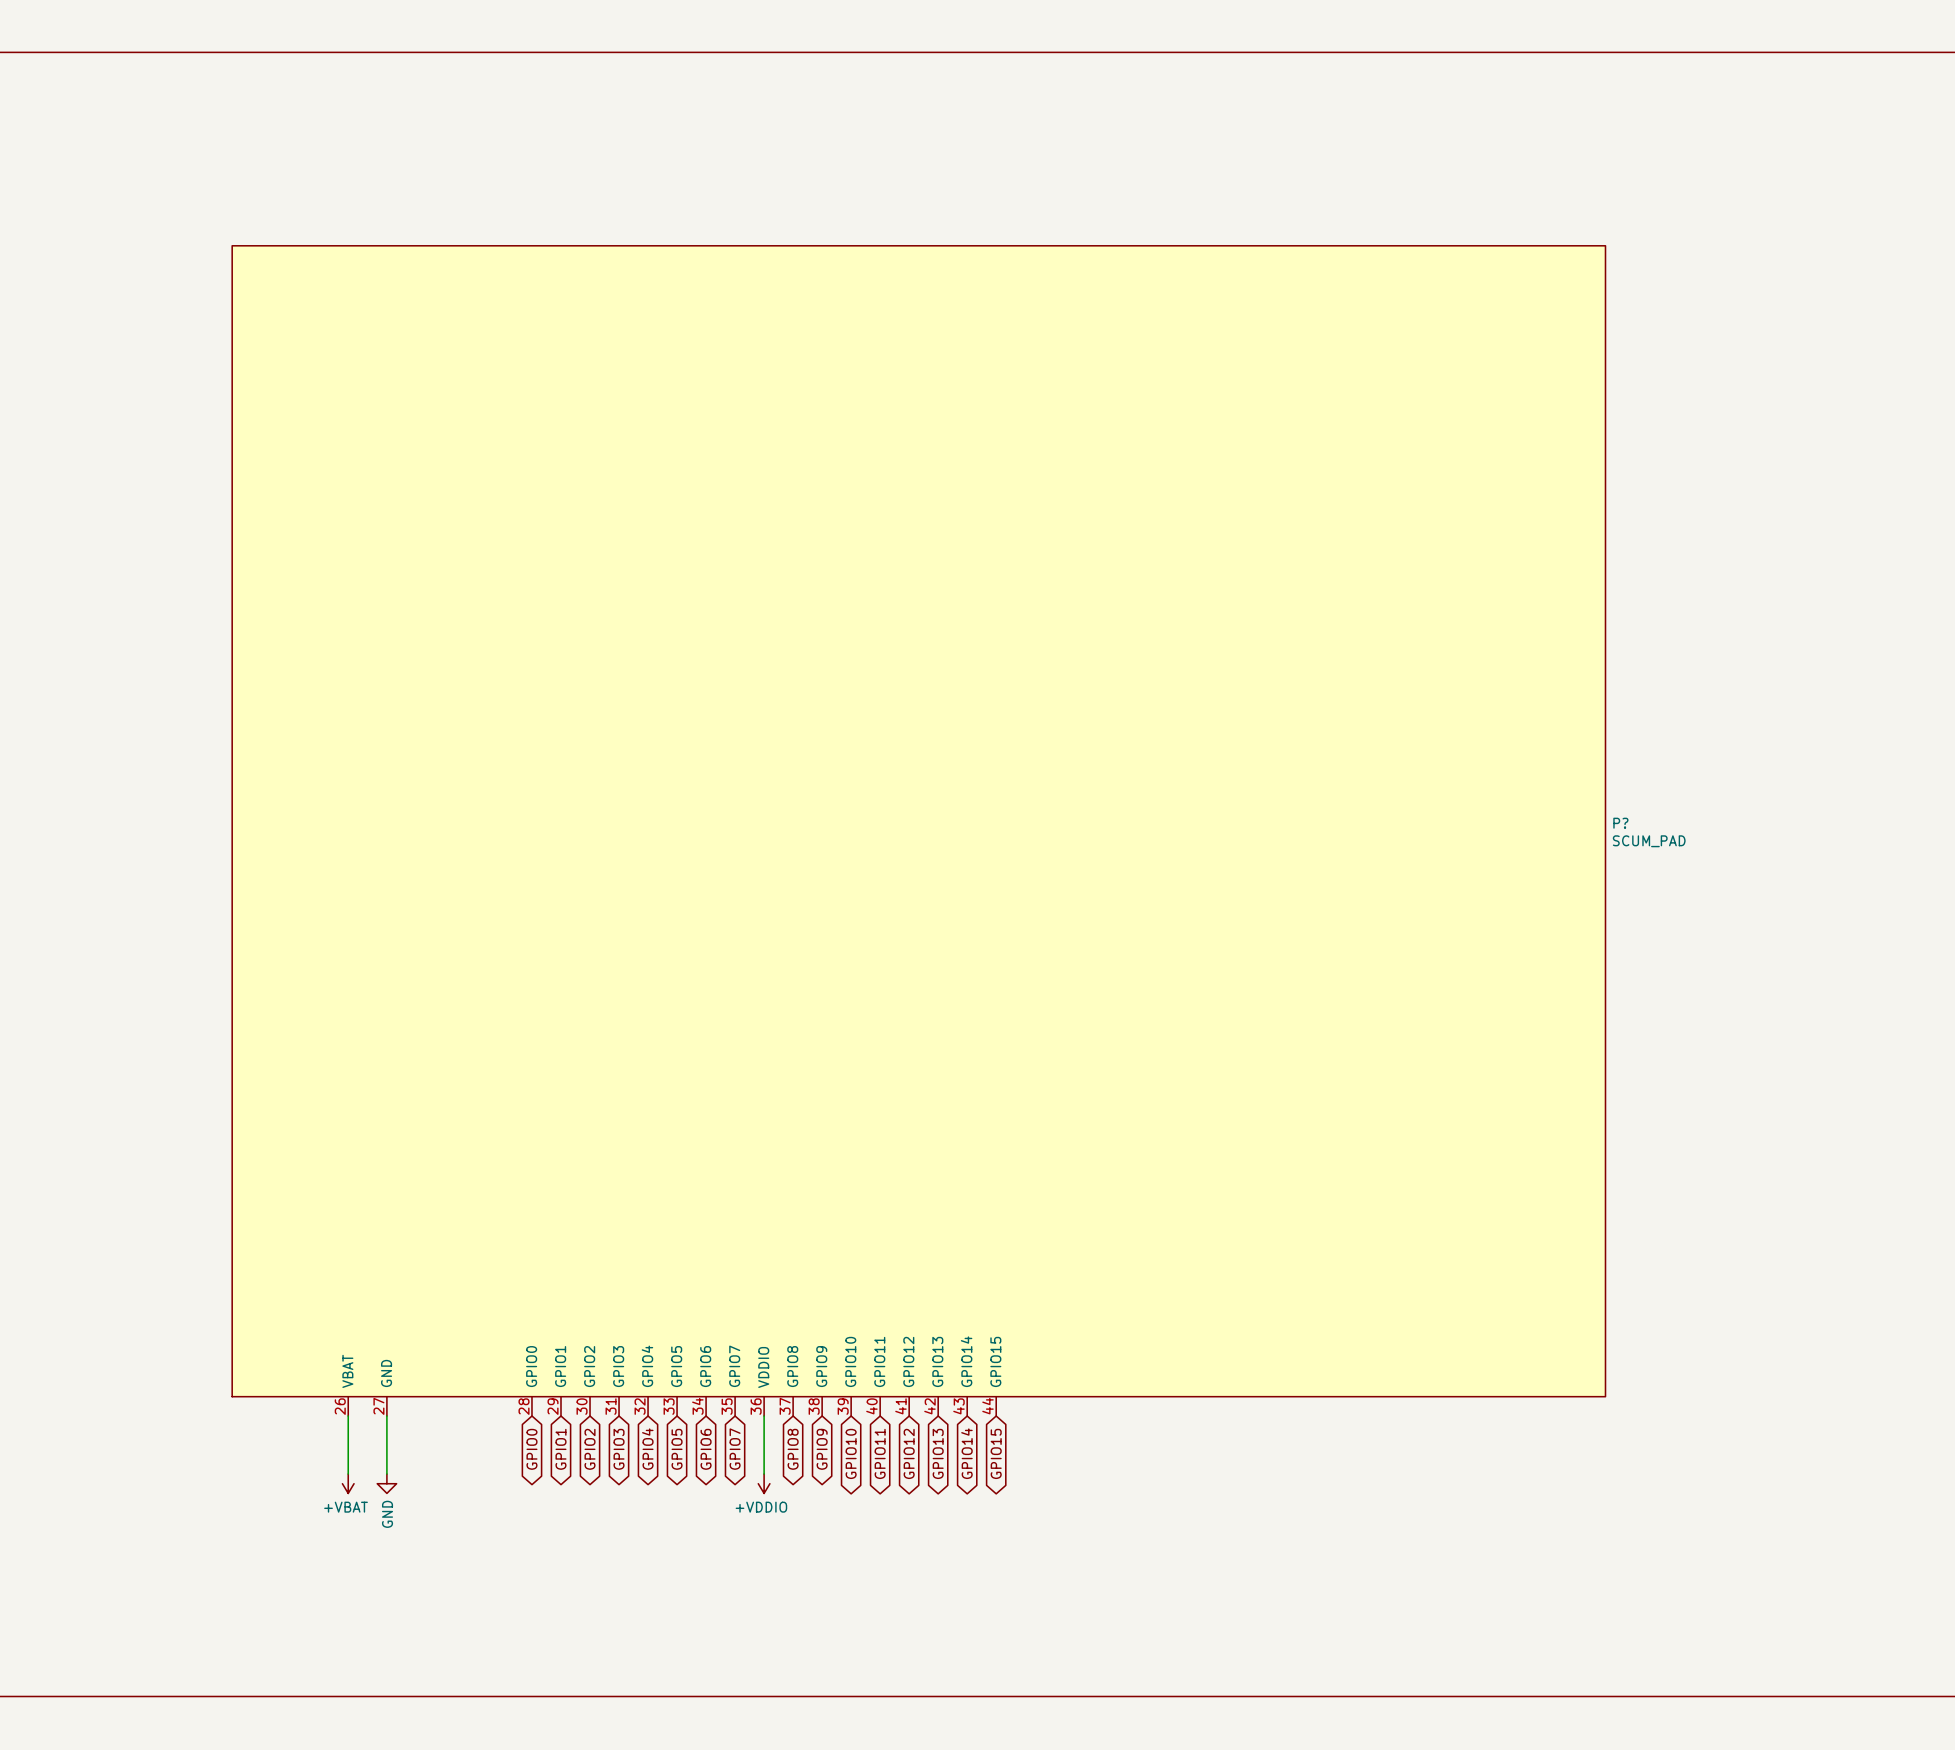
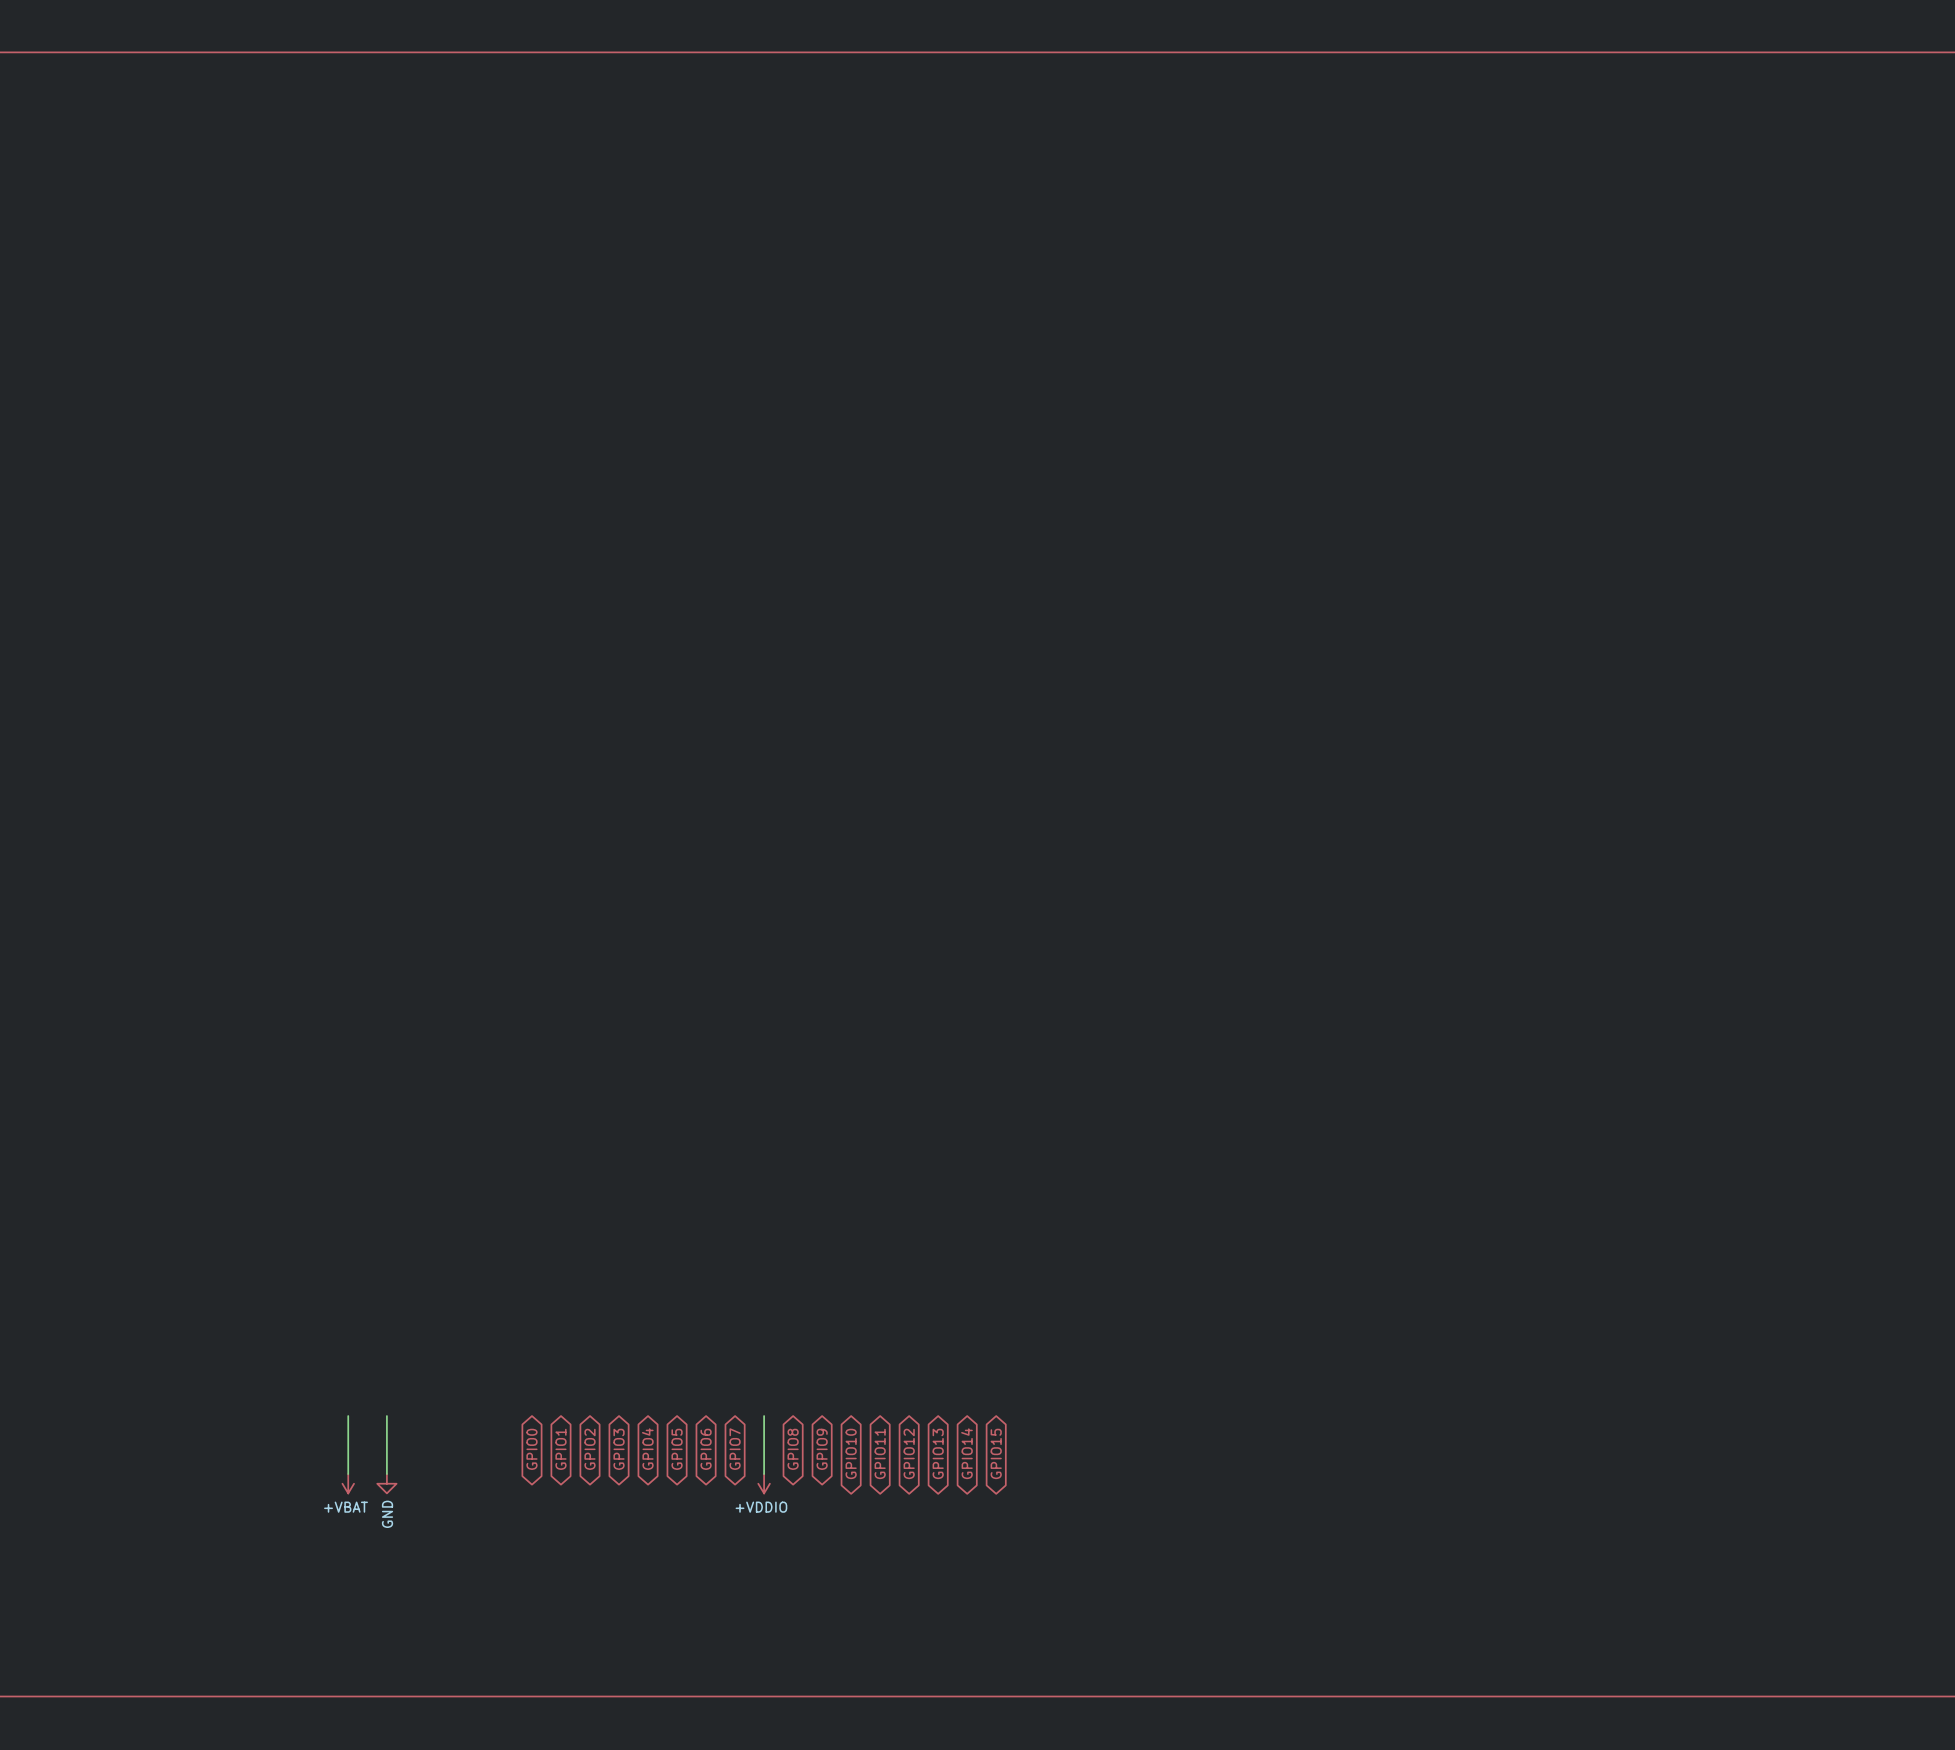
P?: SCUM_PAD (918, 830) -> none

